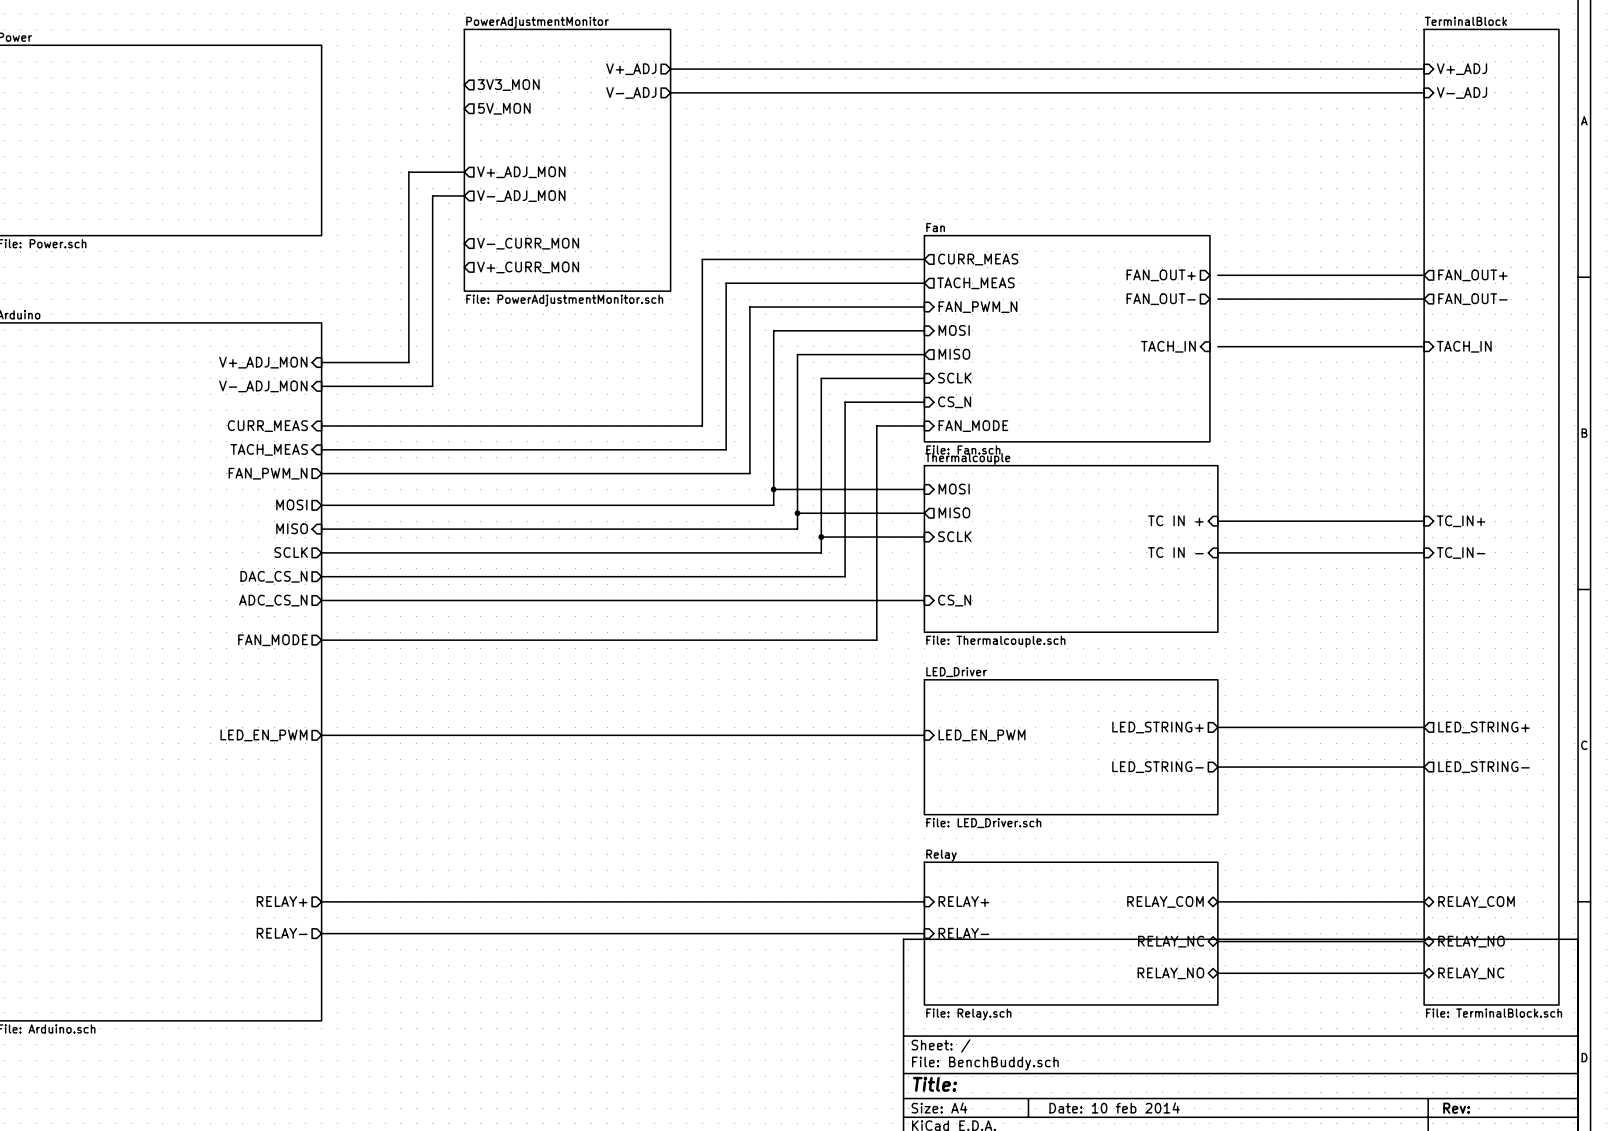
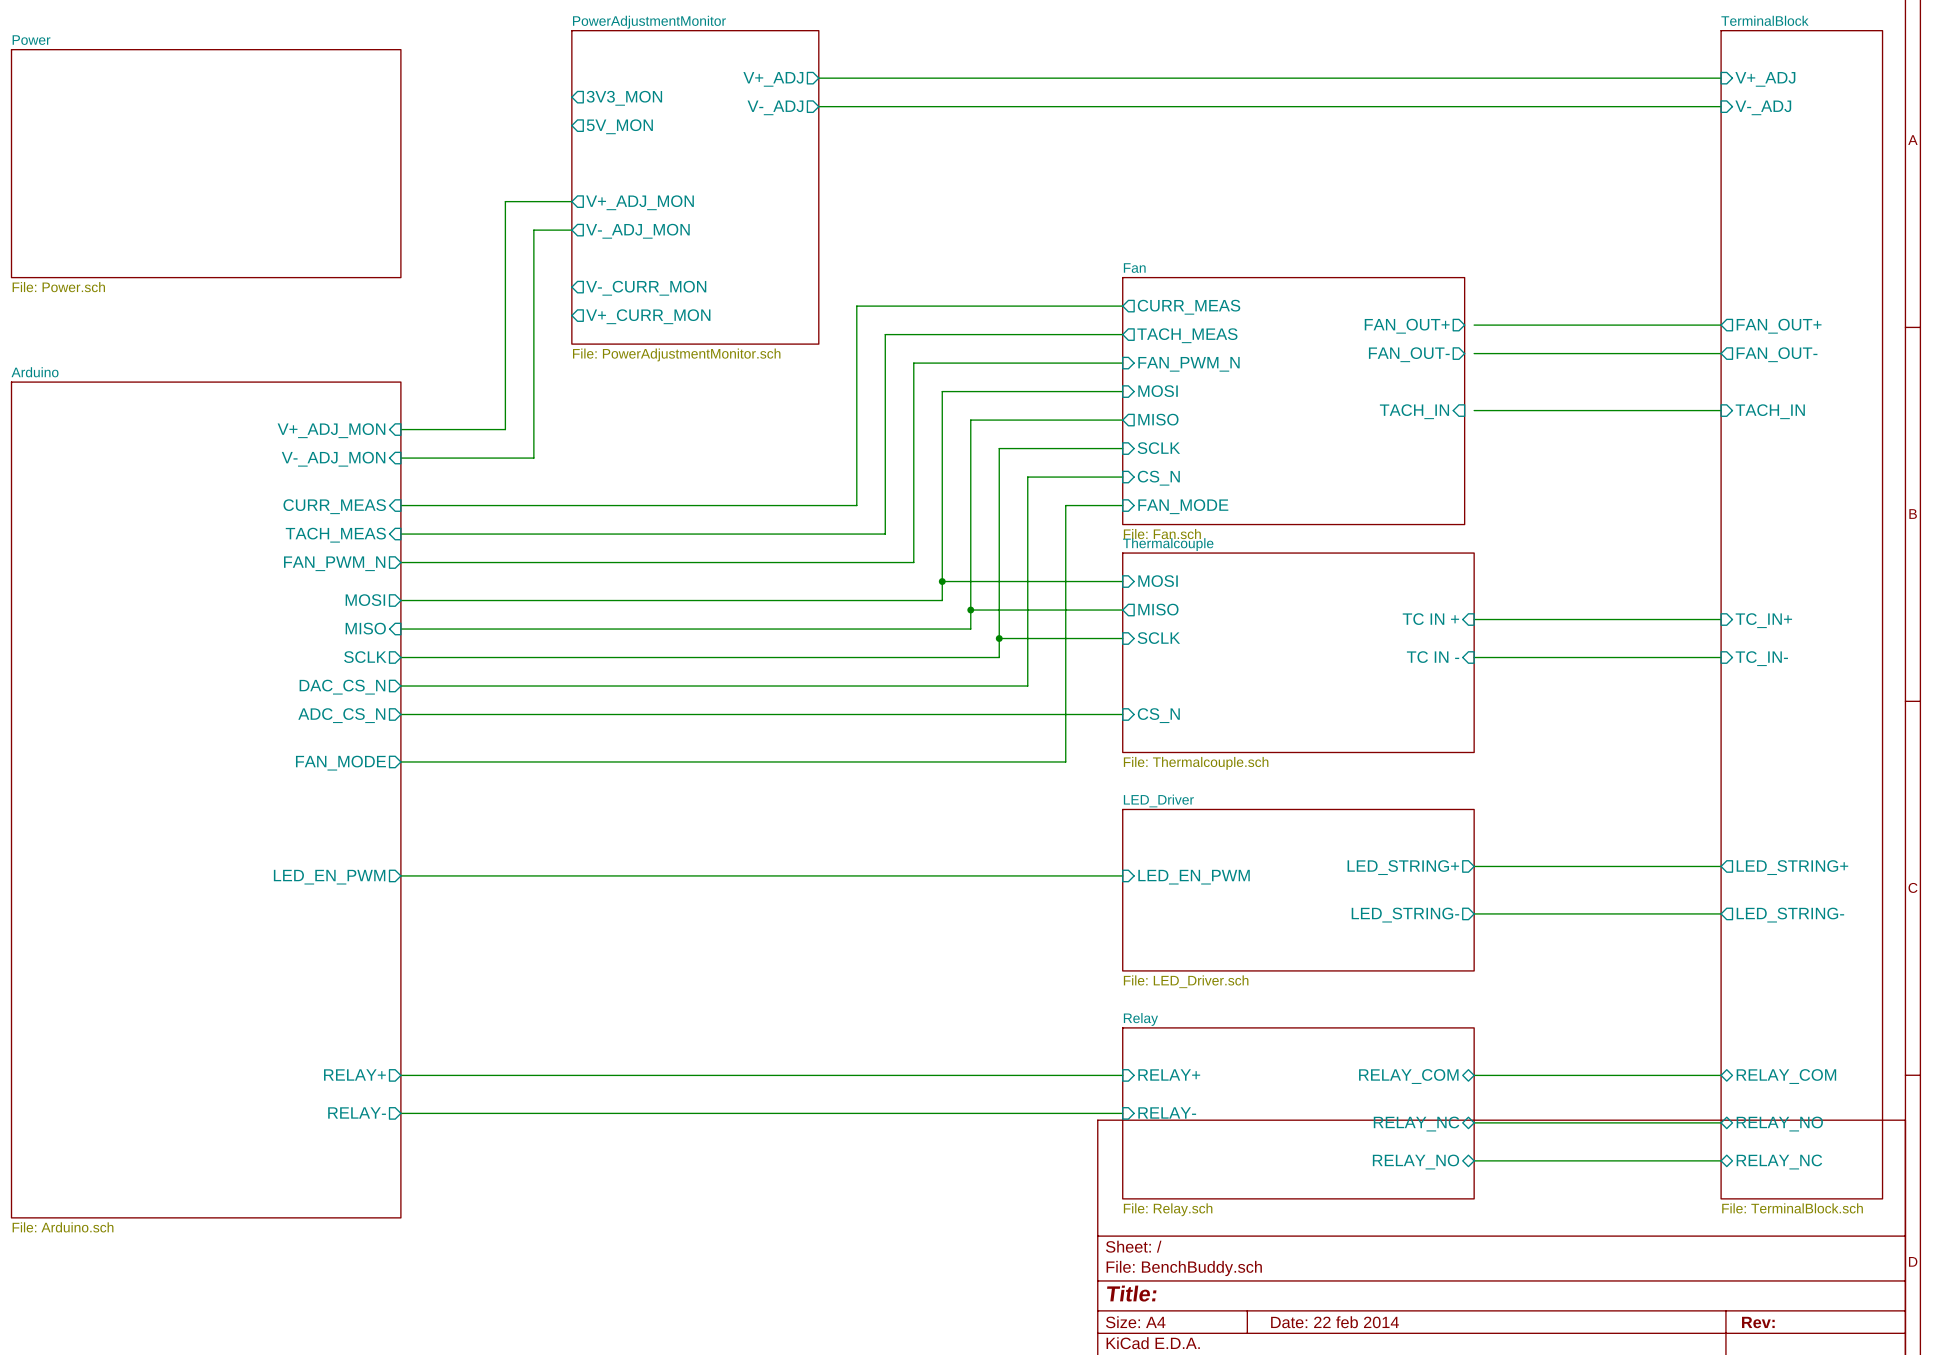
title block: Date: 10 feb 2014 (1114, 1107) -> Date: 22 feb 2014 (1335, 1322)

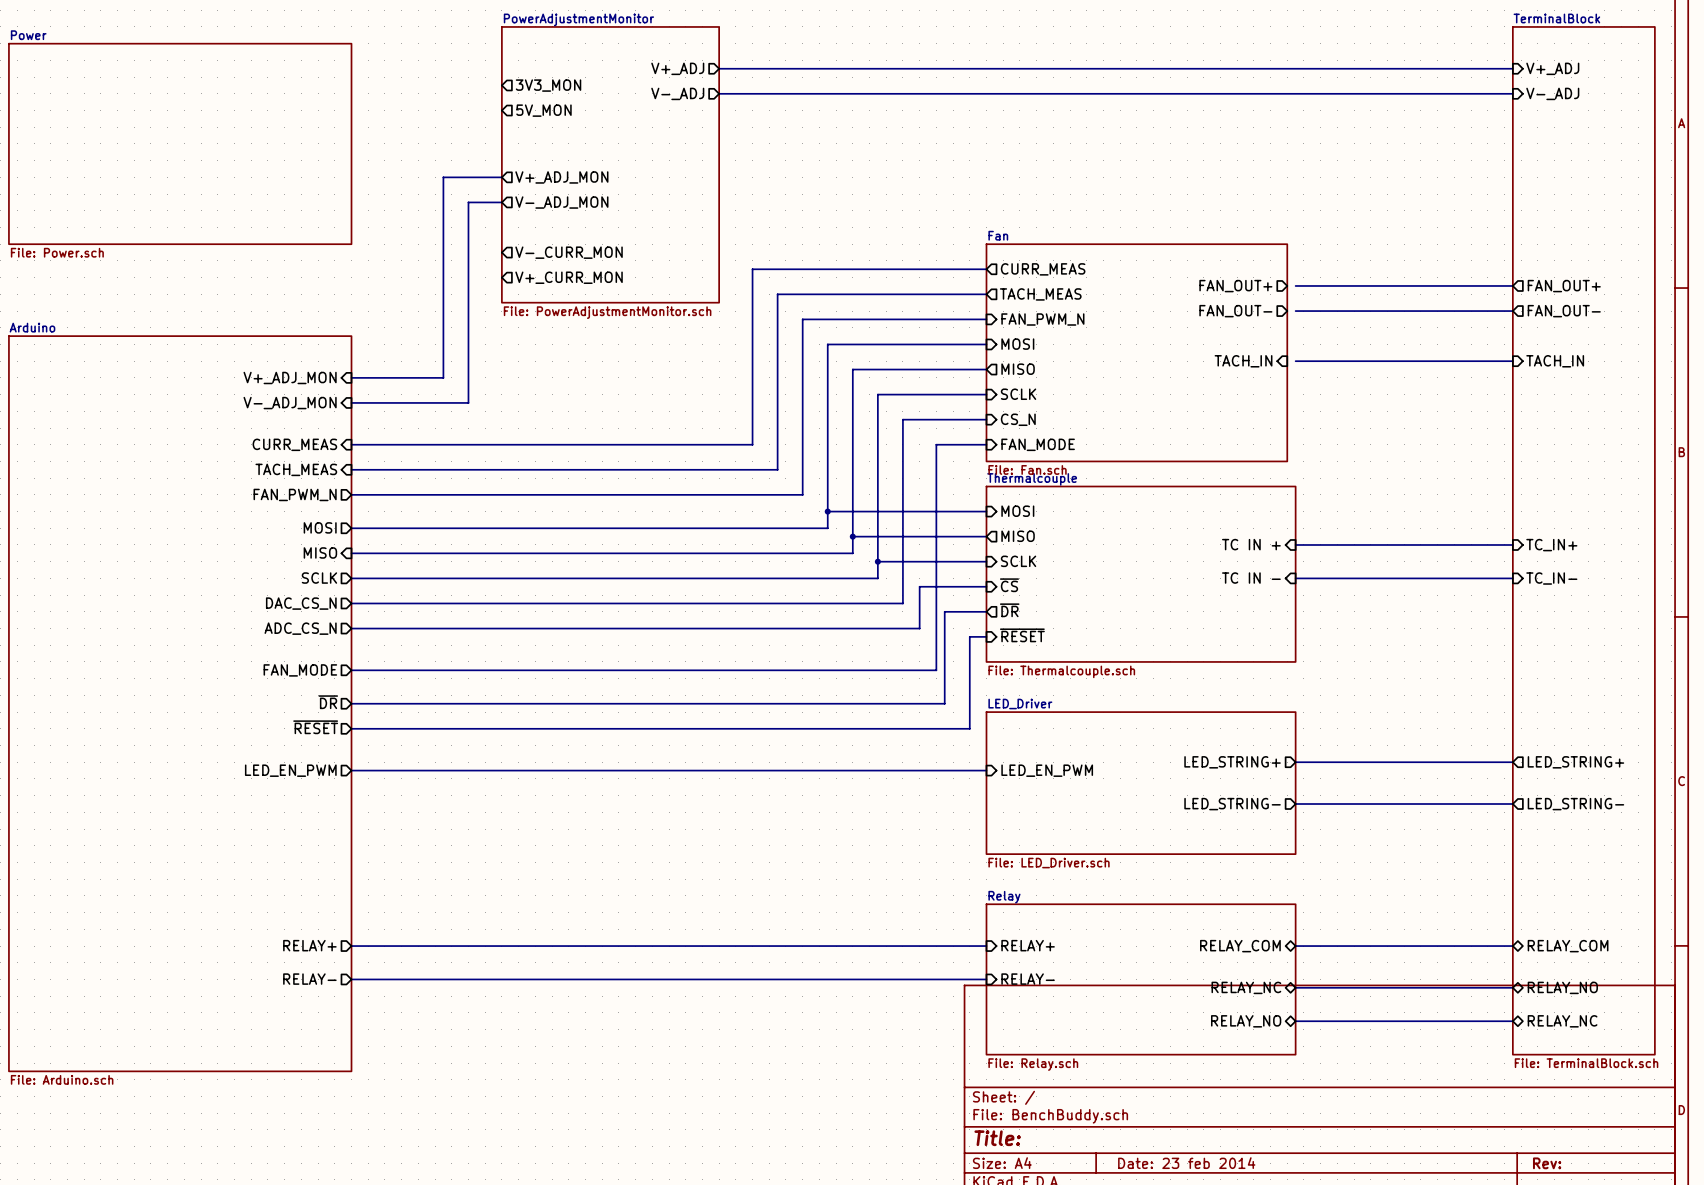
sheet pin: none -> ~{CS} (1009, 585)
sheet pin: none -> ~{DR} (1009, 610)
wire: none -> (986, 611) (944, 611) (944, 703) (351, 703)
wire: (1046, 714) (1122, 714) -> (919, 628) (919, 586) (986, 586)
sheet pin: CS_N (1158, 715) -> none
sheet pin: none -> ~{RESET} (1022, 635)
wire: none -> (986, 636) (969, 636) (969, 728) (351, 728)
sheet pin: none -> ~{DR} (328, 702)
sheet pin: none -> ~{RESET} (315, 727)
title block: Date: 22 feb 2014 (1335, 1322) -> Date: 23 feb 2014 (1186, 1163)

